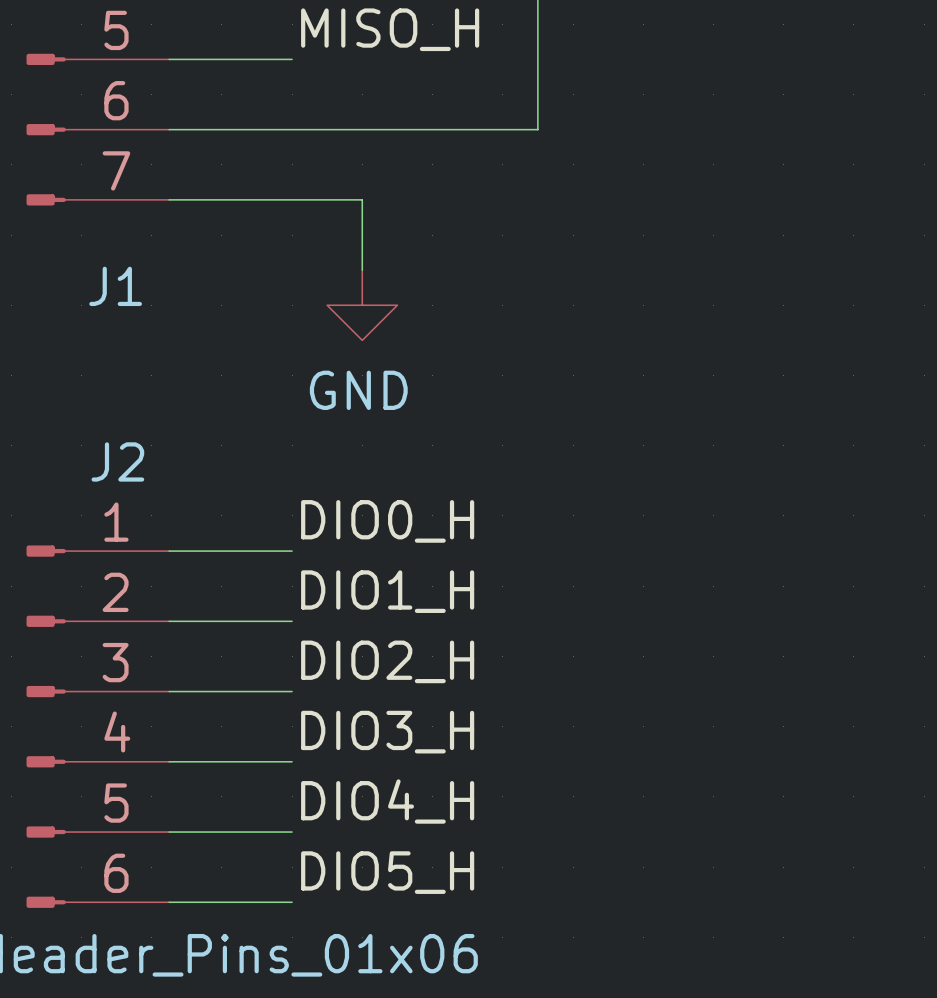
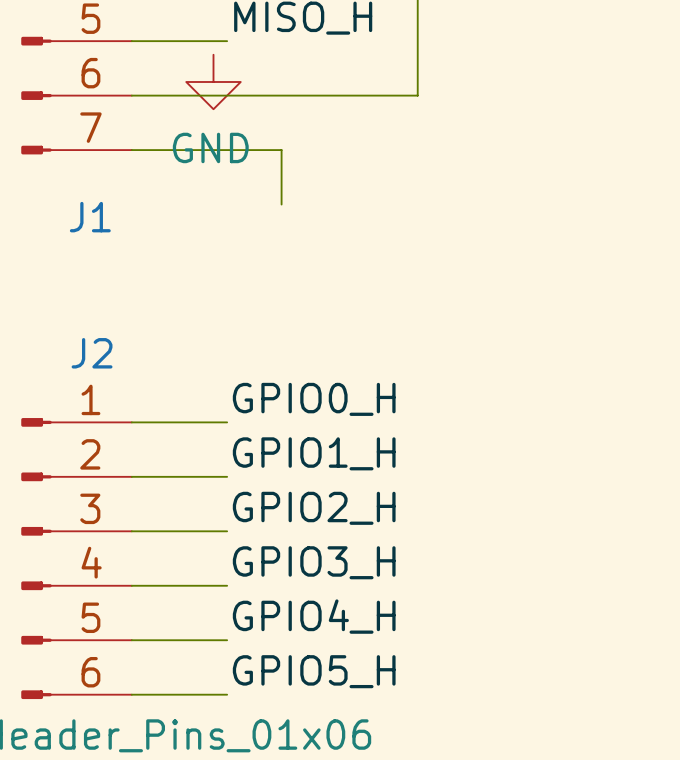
power symbol position: GND (362, 305) -> GND (213, 81)
label: DIO0_H (387, 521) -> GPIO0_H (314, 399)
label: DIO1_H (387, 591) -> GPIO1_H (314, 453)
label: DIO2_H (387, 661) -> GPIO2_H (314, 508)
label: DIO3_H (387, 732) -> GPIO3_H (314, 562)
label: DIO4_H (387, 801) -> GPIO4_H (314, 616)
label: DIO5_H (387, 872) -> GPIO5_H (314, 671)

